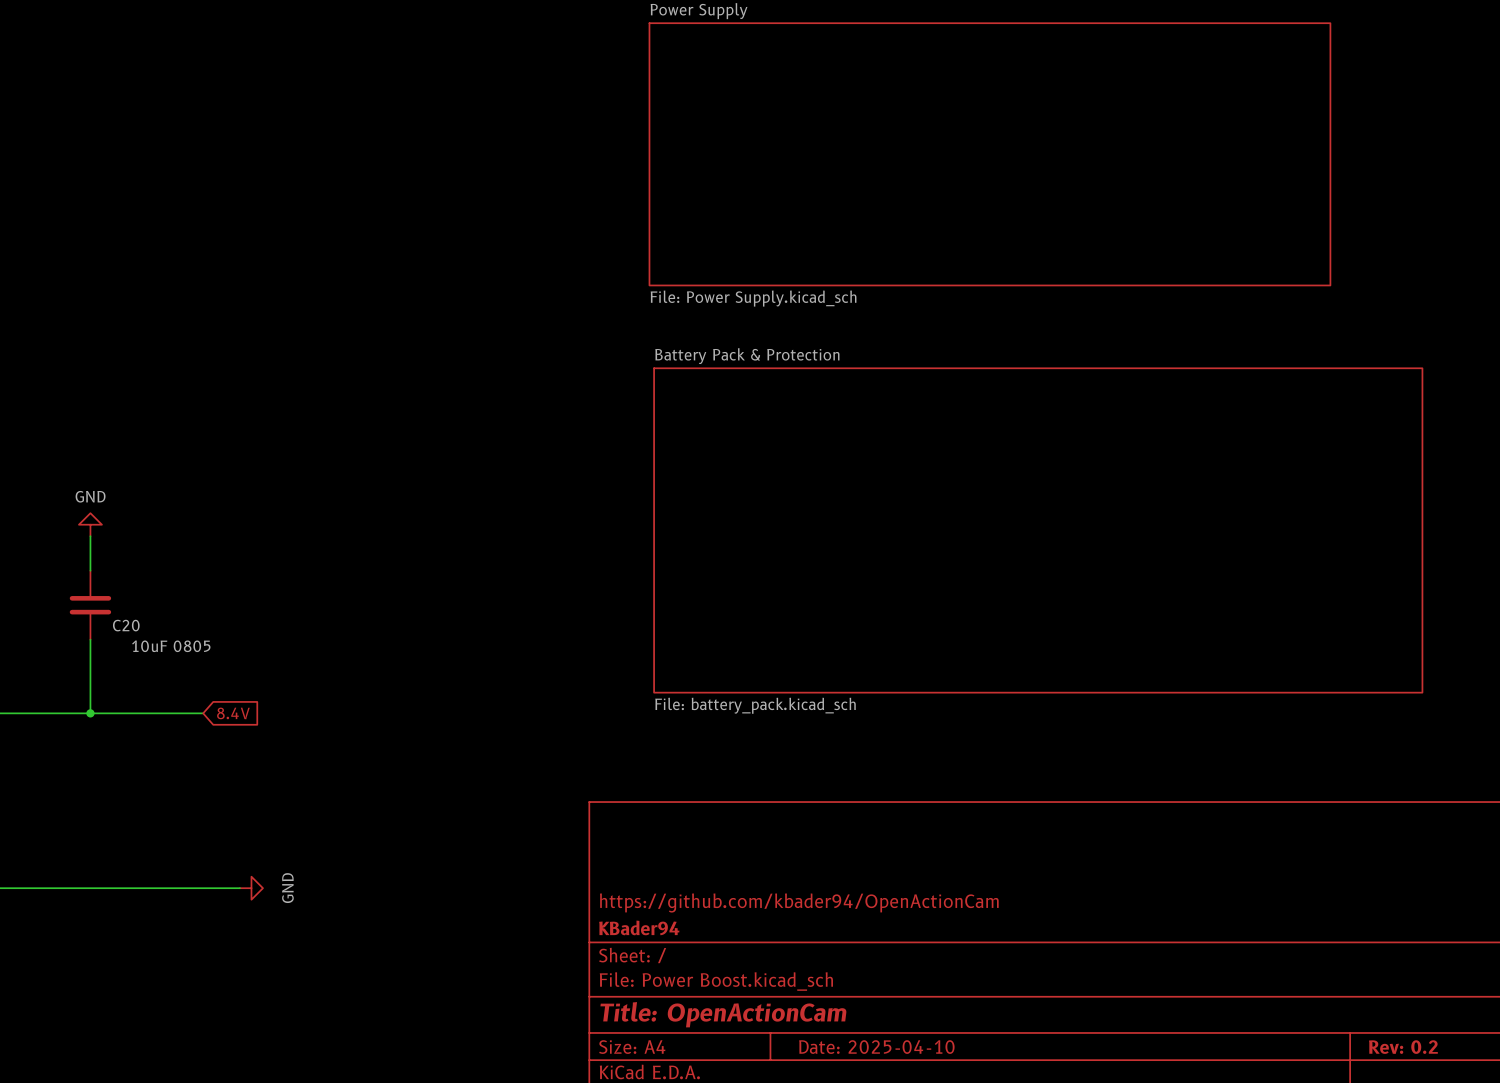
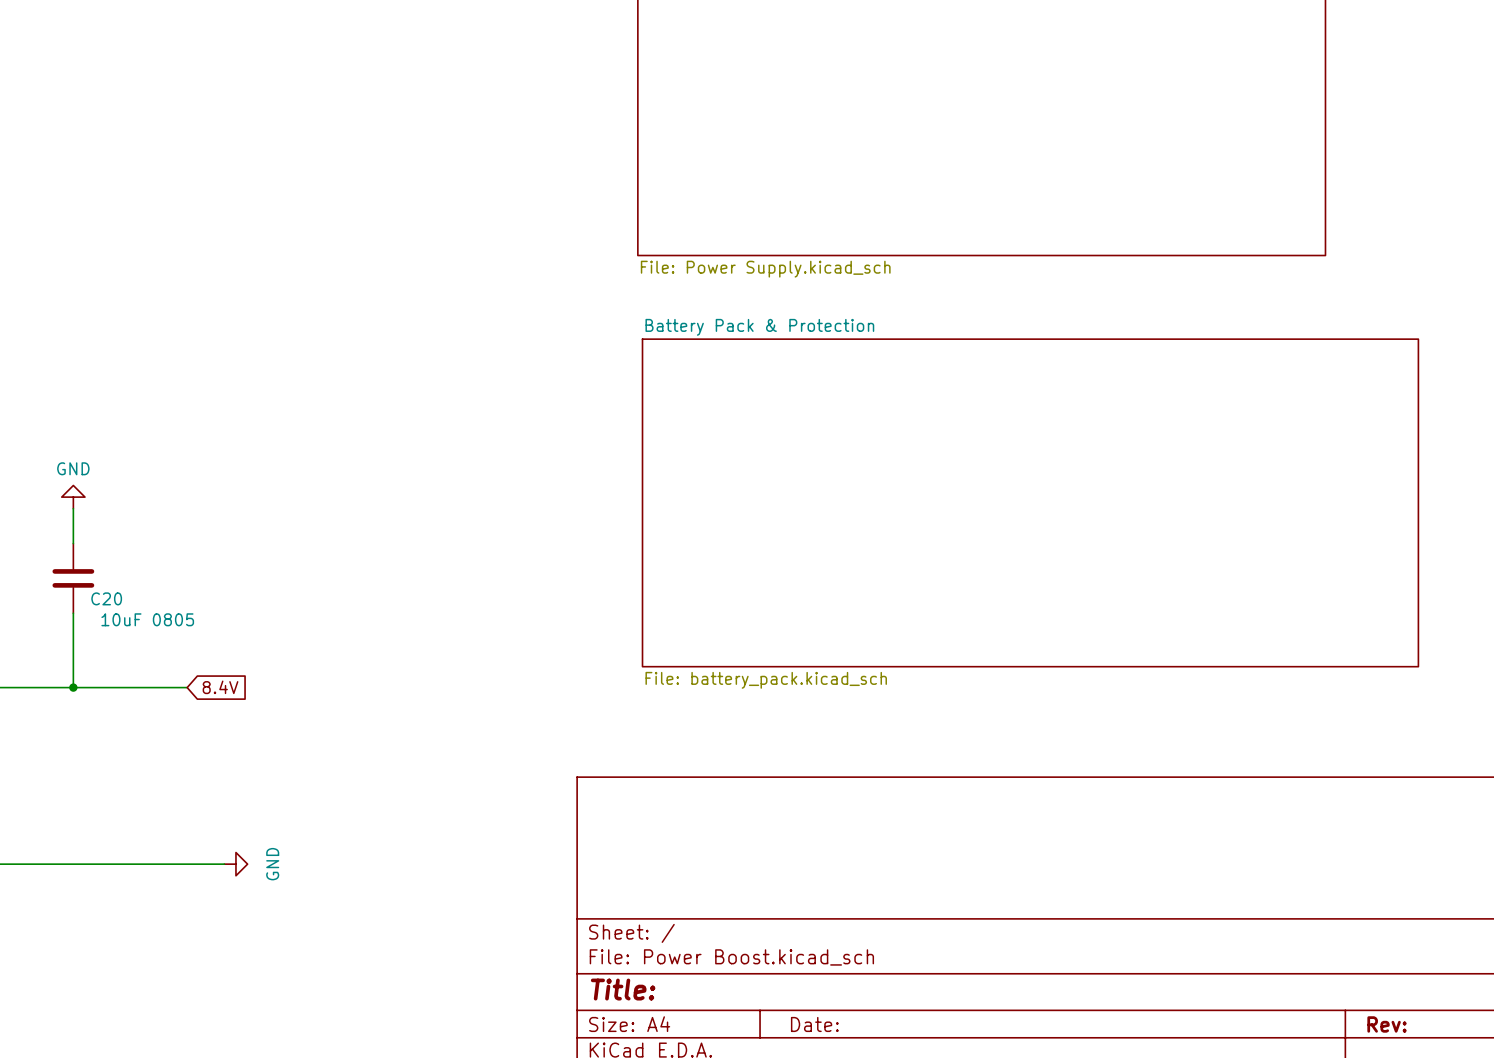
title block: https://github.com/kbader94/OpenActionCam (799, 903) -> none
title block: KBader94 (639, 927) -> none
title block: Title: OpenActionCam (723, 1014) -> Title: (623, 989)
title block: Date: 2025-04-10 (876, 1047) -> Date: (814, 1024)
title block: Rev: 0.2 (1403, 1047) -> Rev: (1387, 1024)

